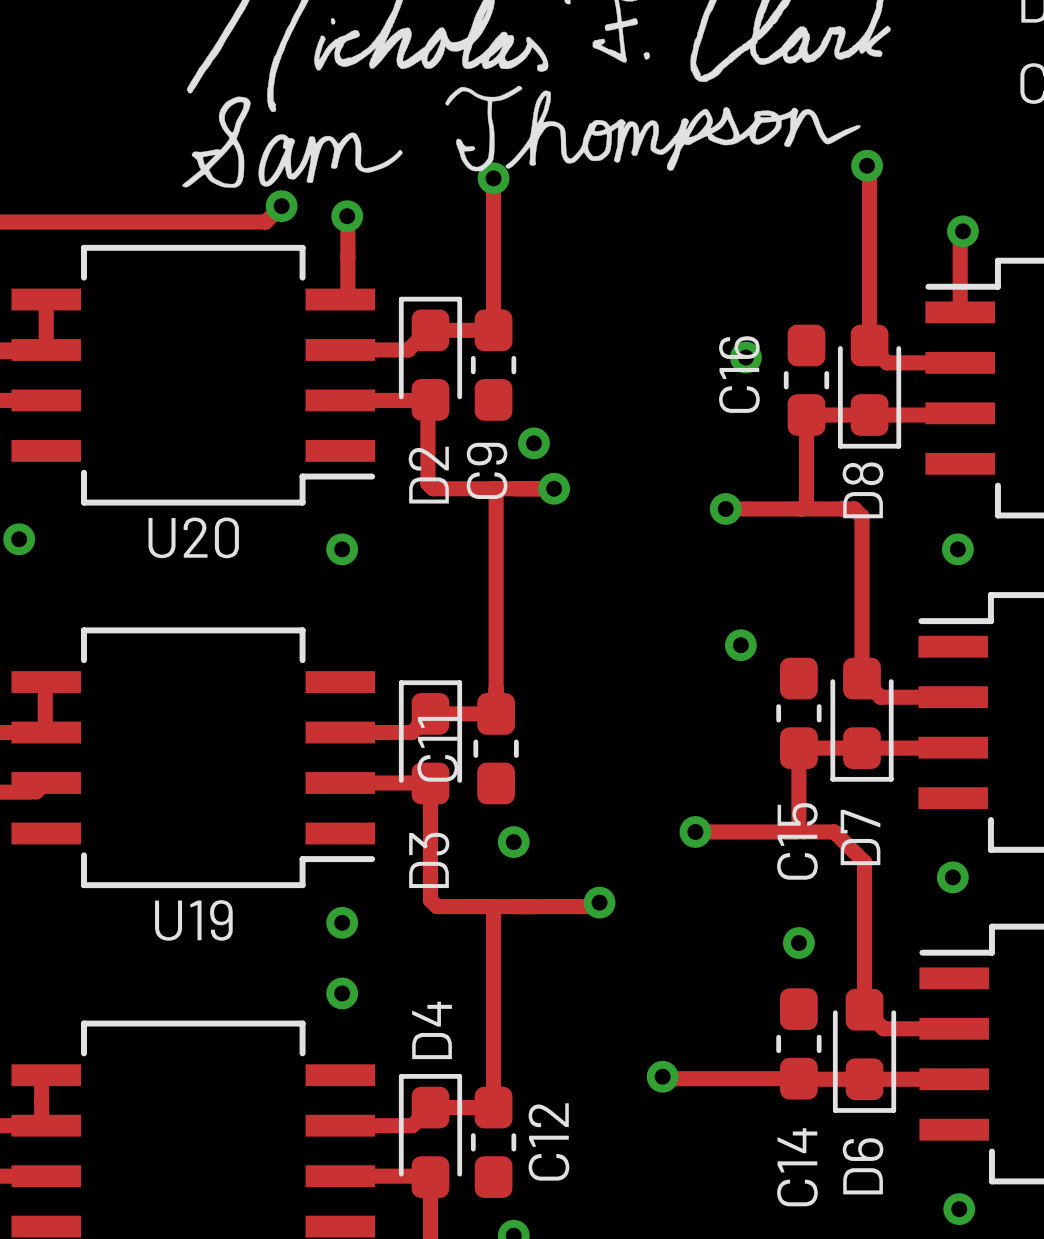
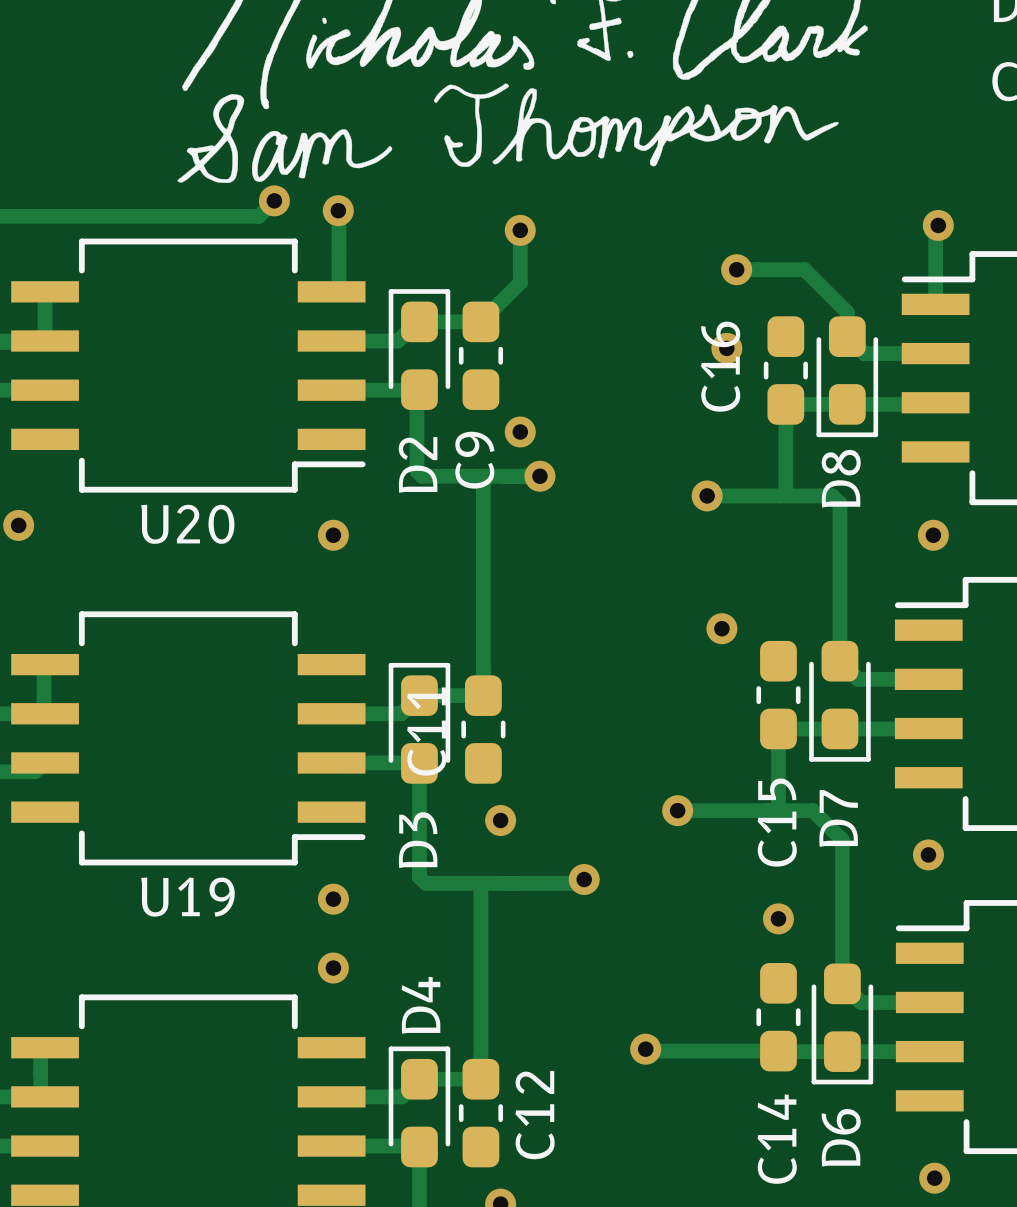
track: (867, 165) (869, 168) (869, 320) -> (736, 269) (804, 269) (847, 312)
via: (867, 165) -> none
track: (493, 178) (493, 330) -> (520, 230) (520, 282) (480, 321)
via position: (493, 178) -> (520, 230)
via: none -> (736, 269)

